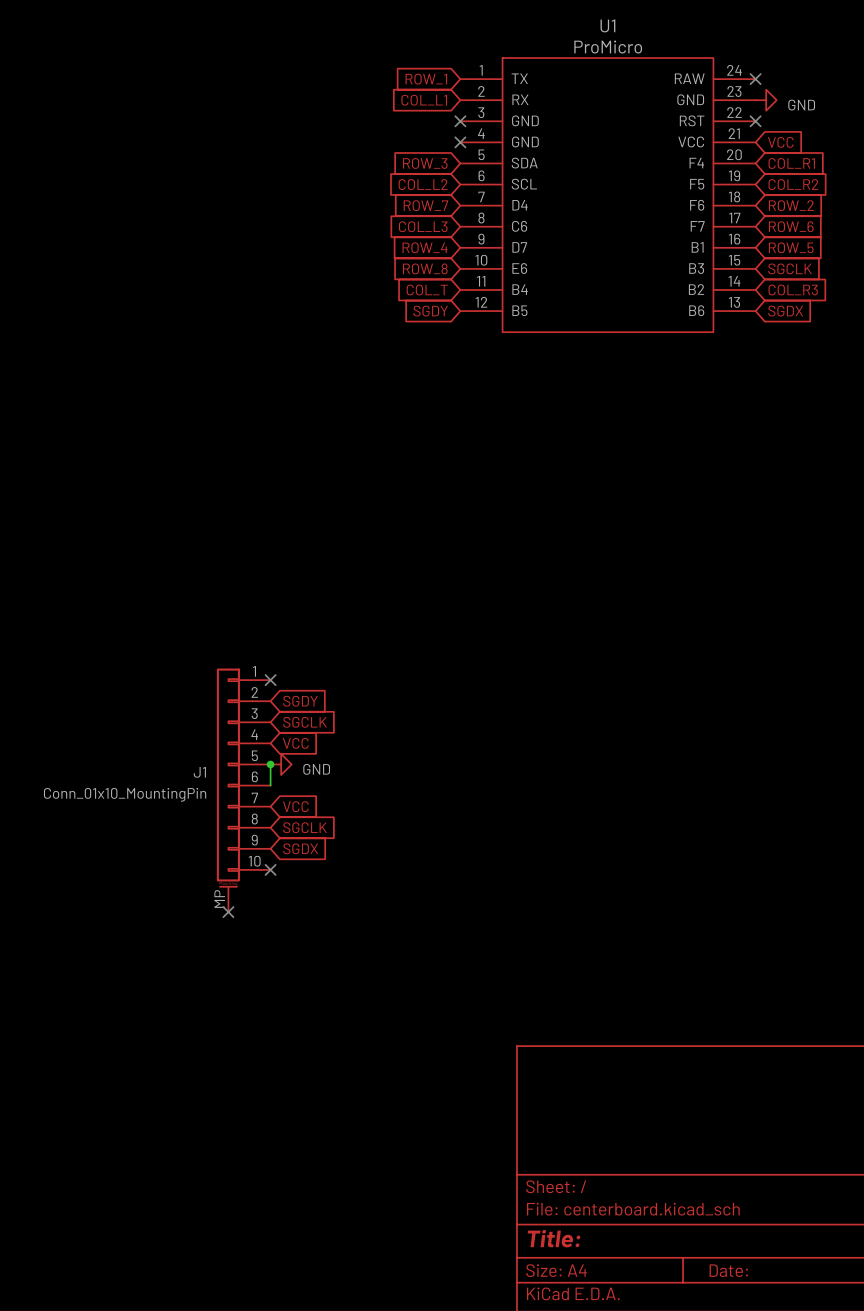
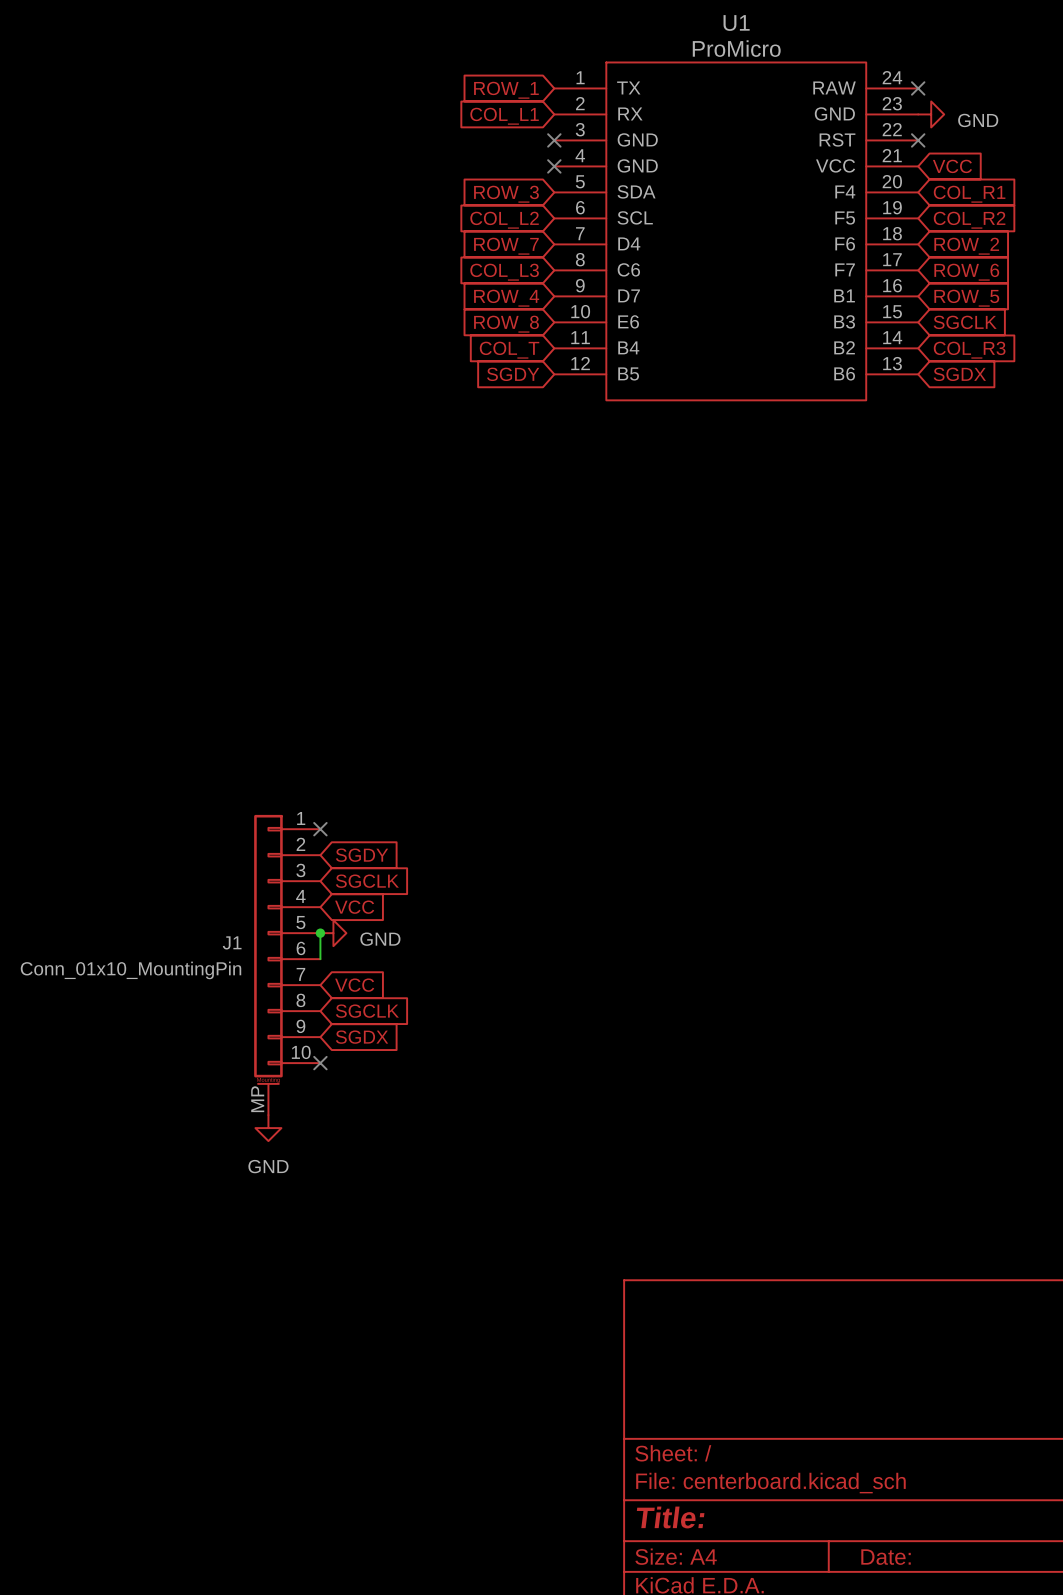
no-connect mark: (228, 912) -> none
power symbol: none -> GND (268, 1128)

